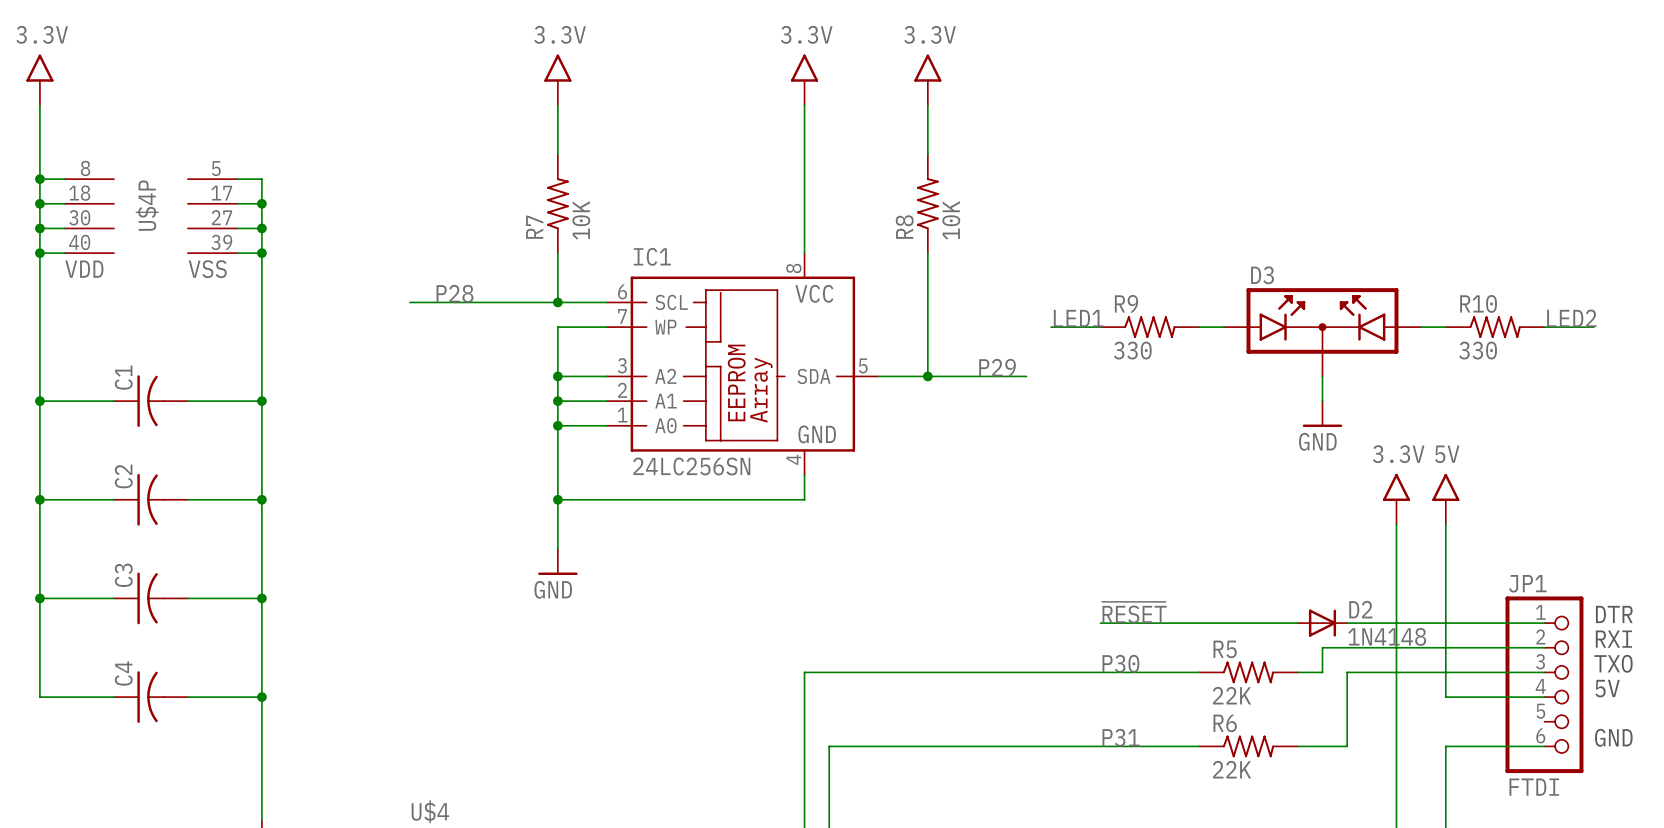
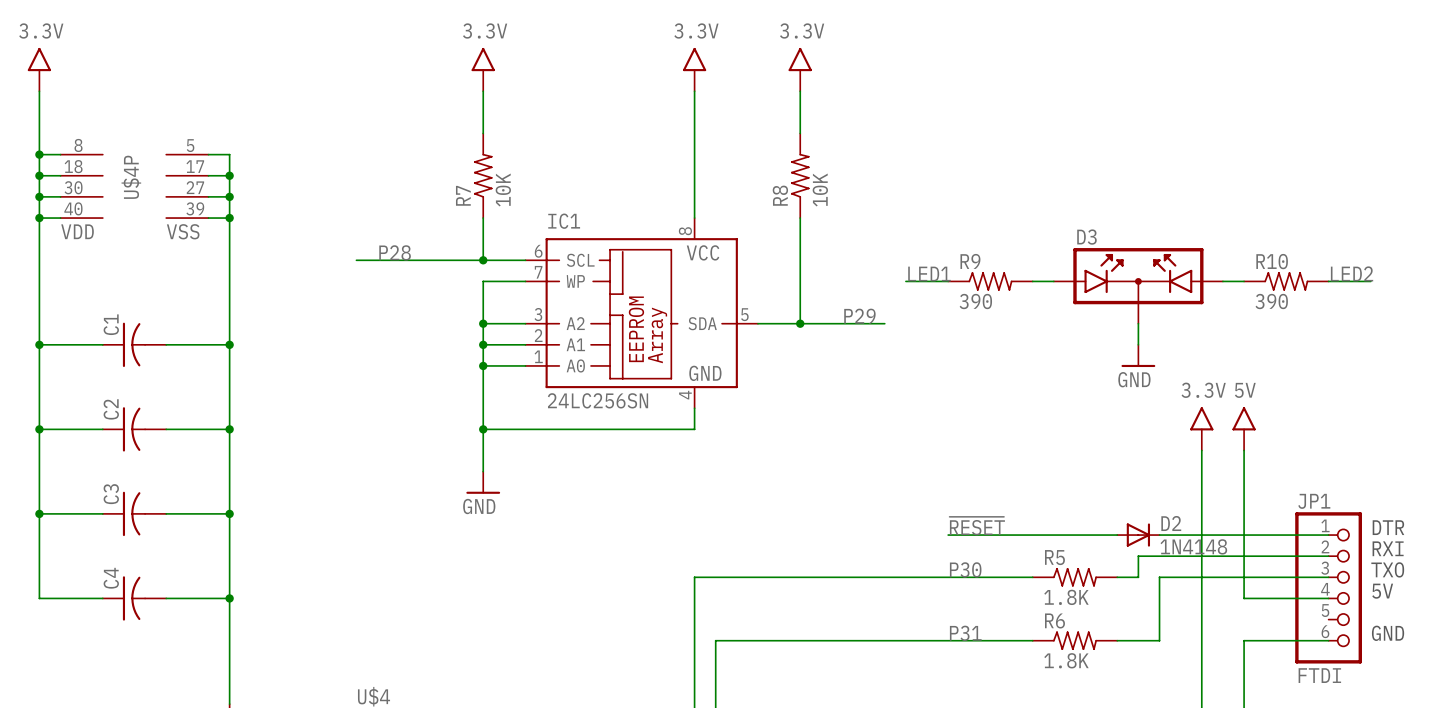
R9 value: 330 (1132, 350) -> 390 (975, 301)
R10 value: 330 (1478, 350) -> 390 (1271, 301)
R5 value: 22K (1232, 695) -> 1.8K (1066, 597)
R6 value: 22K (1232, 769) -> 1.8K (1066, 660)

